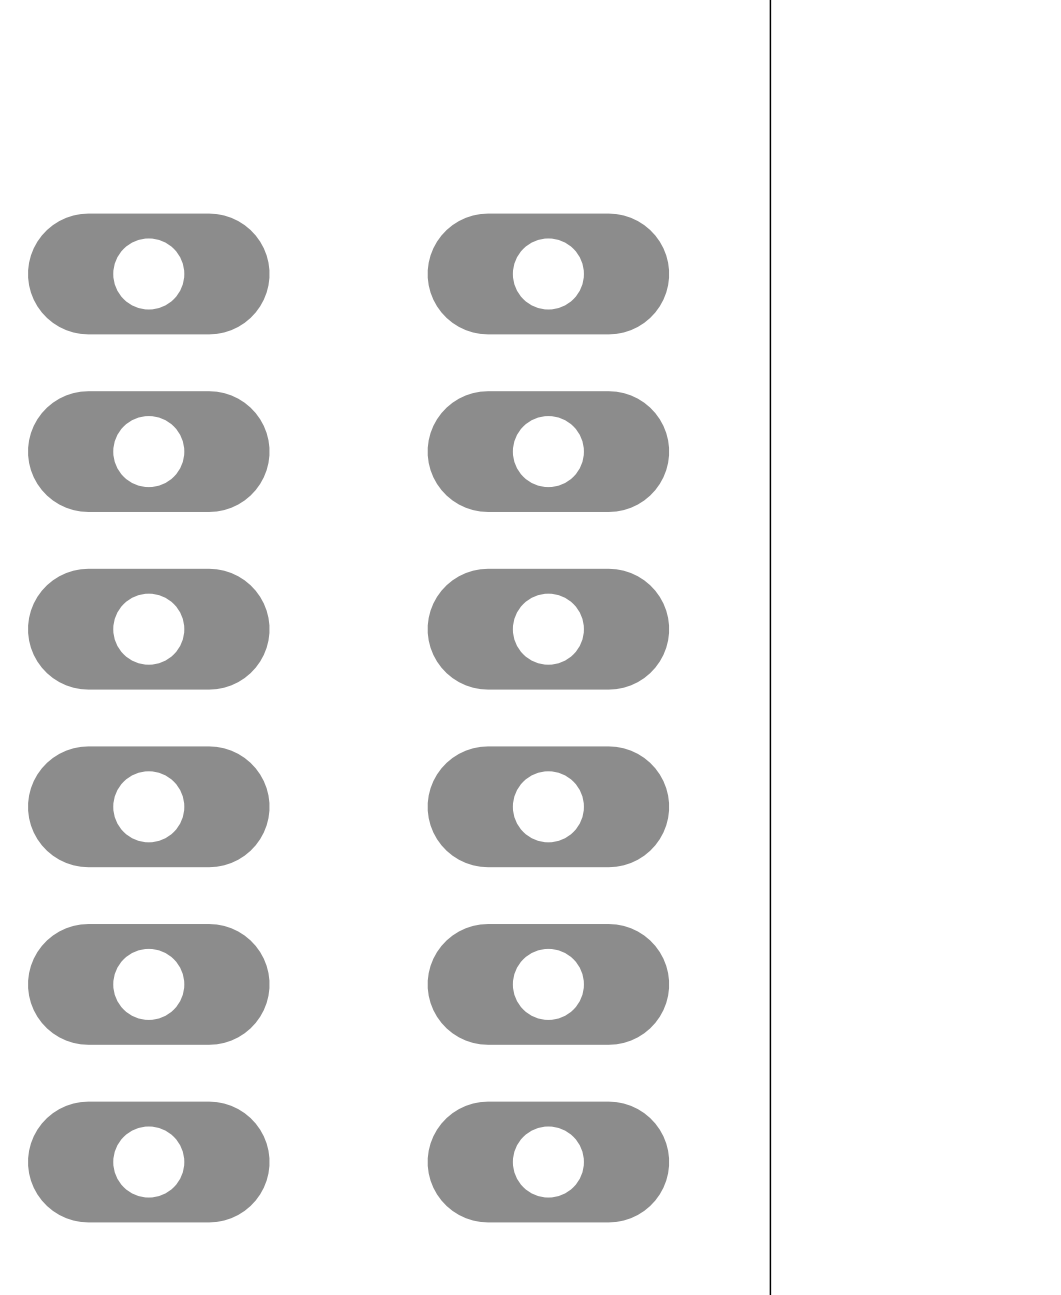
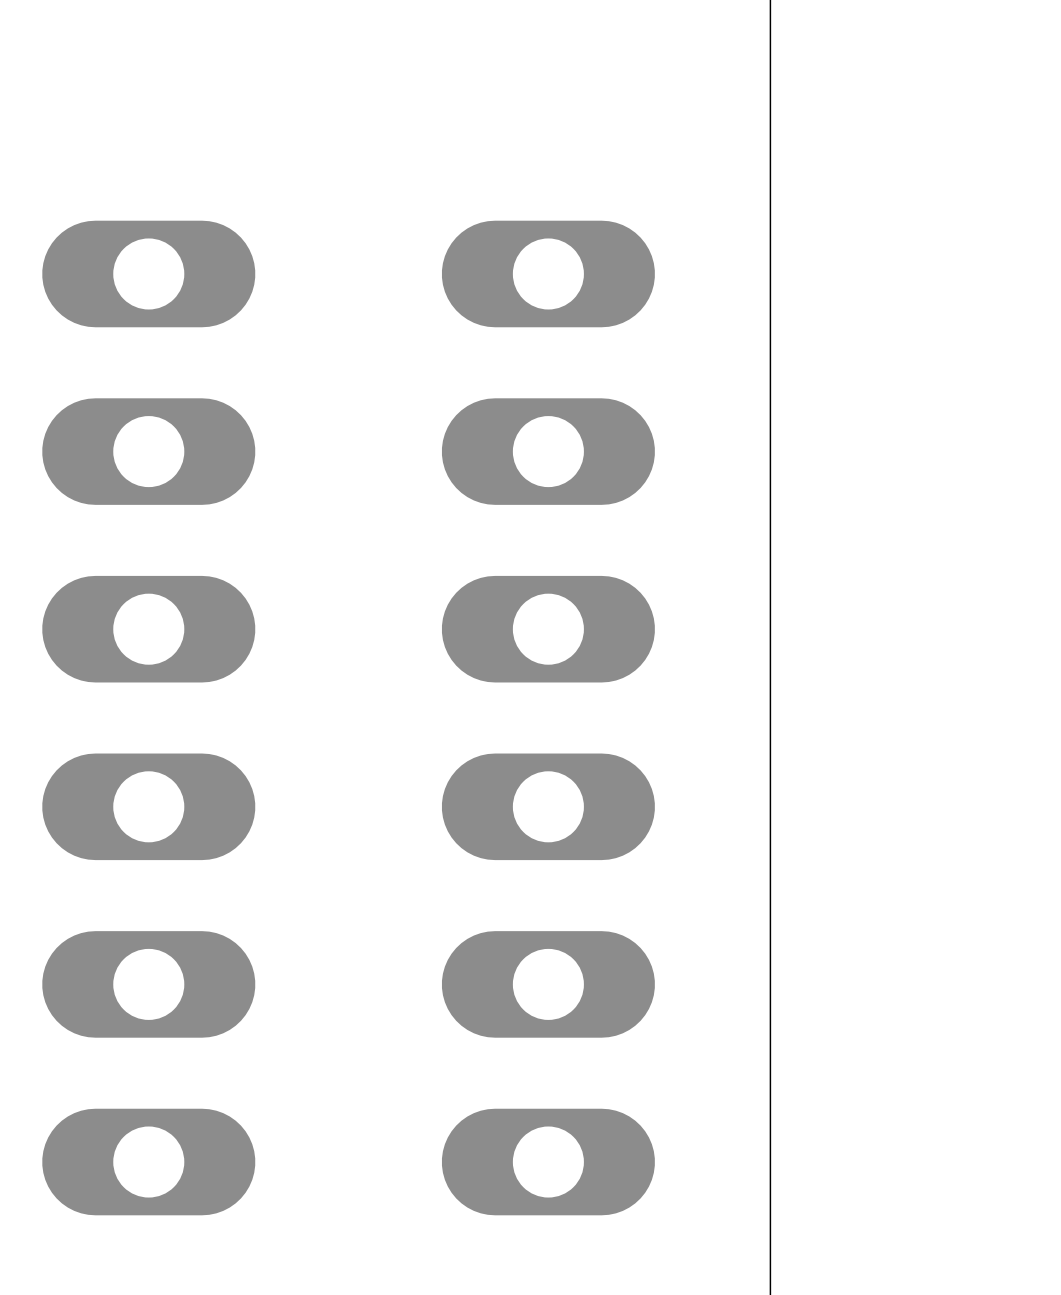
part footprint: [28, 213, 270, 1223] -> [42, 220, 256, 1216]
part footprint: [427, 213, 670, 1223] -> [441, 220, 655, 1216]

